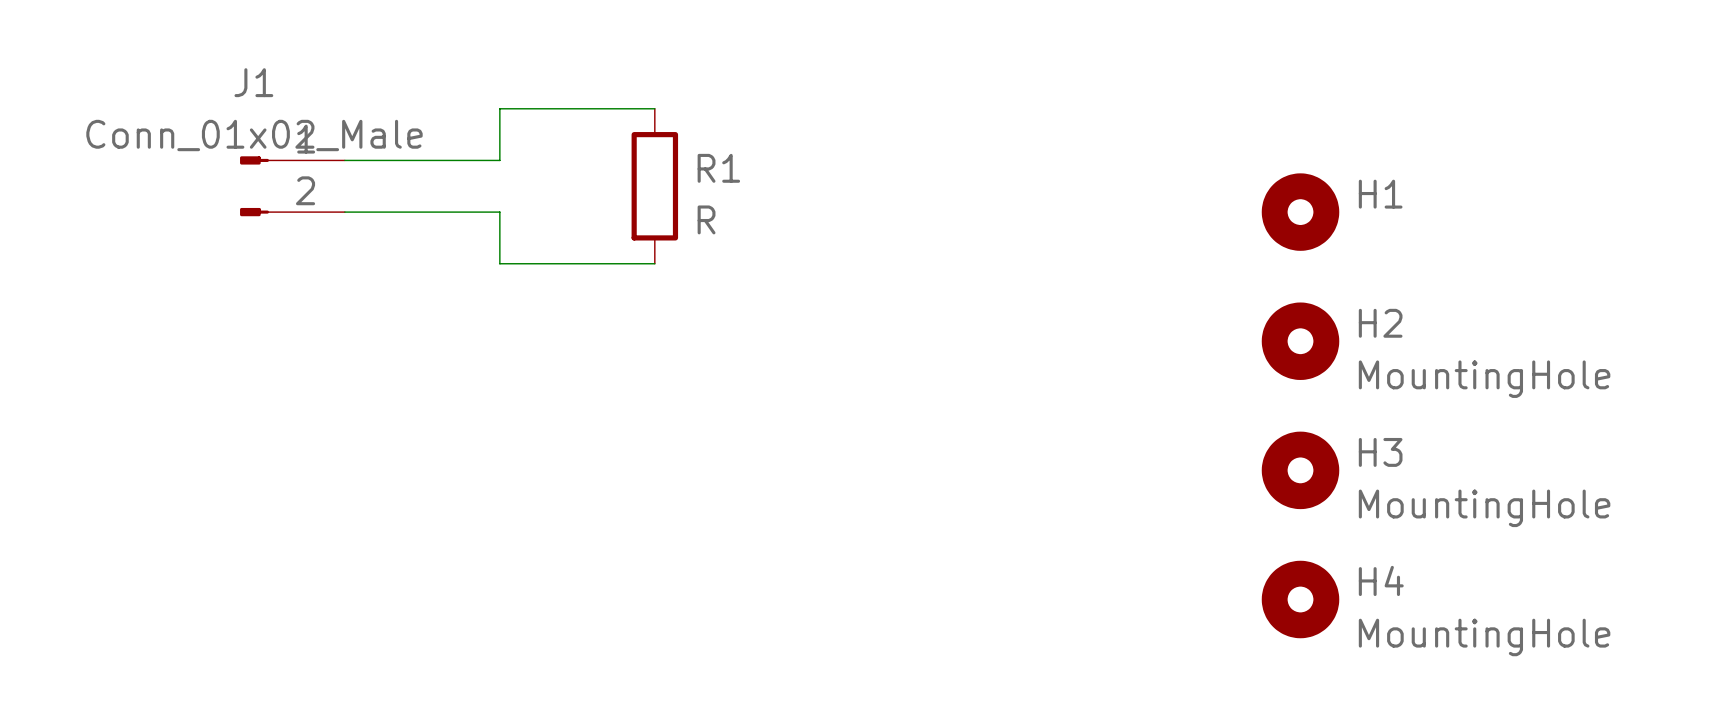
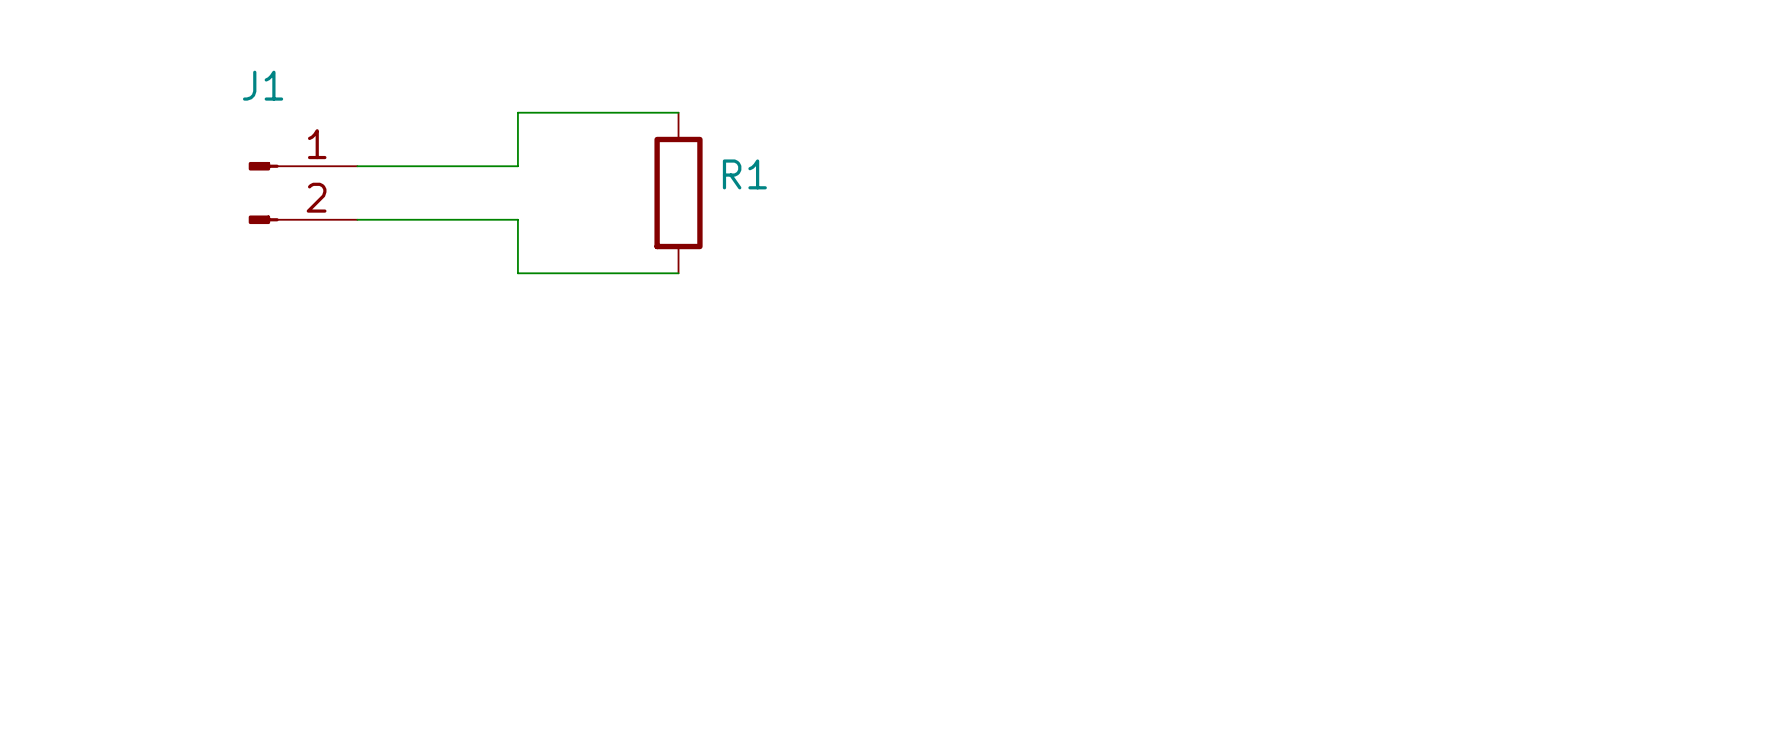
J1 value: Conn_01x02_Male (254, 135) -> none
H1: (1300, 212) -> none
R1 value: R (706, 219) -> none
H2: MountingHole (1300, 341) -> none
H3: MountingHole (1300, 470) -> none
H4: MountingHole (1300, 599) -> none

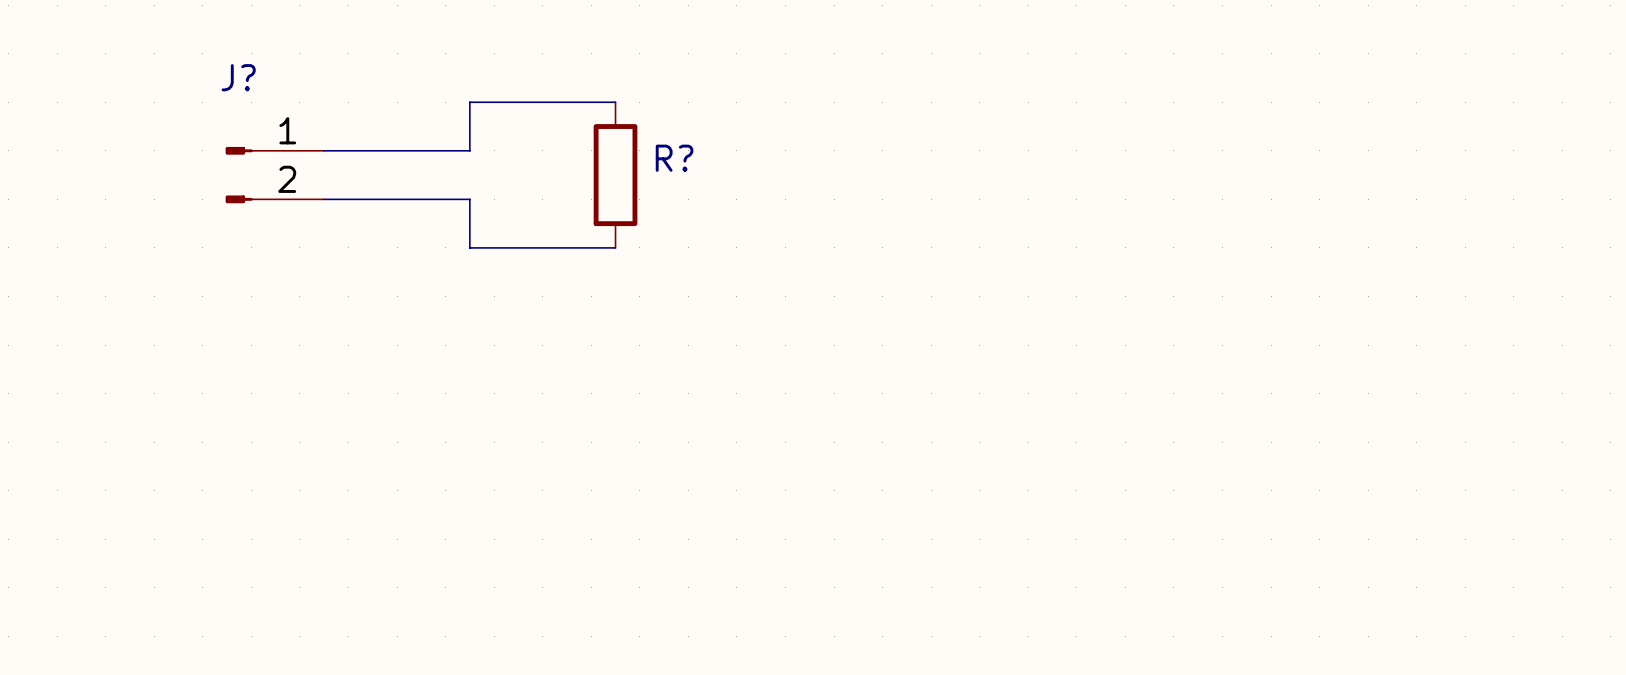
J1 name: J1 (263, 85) -> J? (238, 77)
R1 name: R1 (744, 174) -> R? (674, 158)

